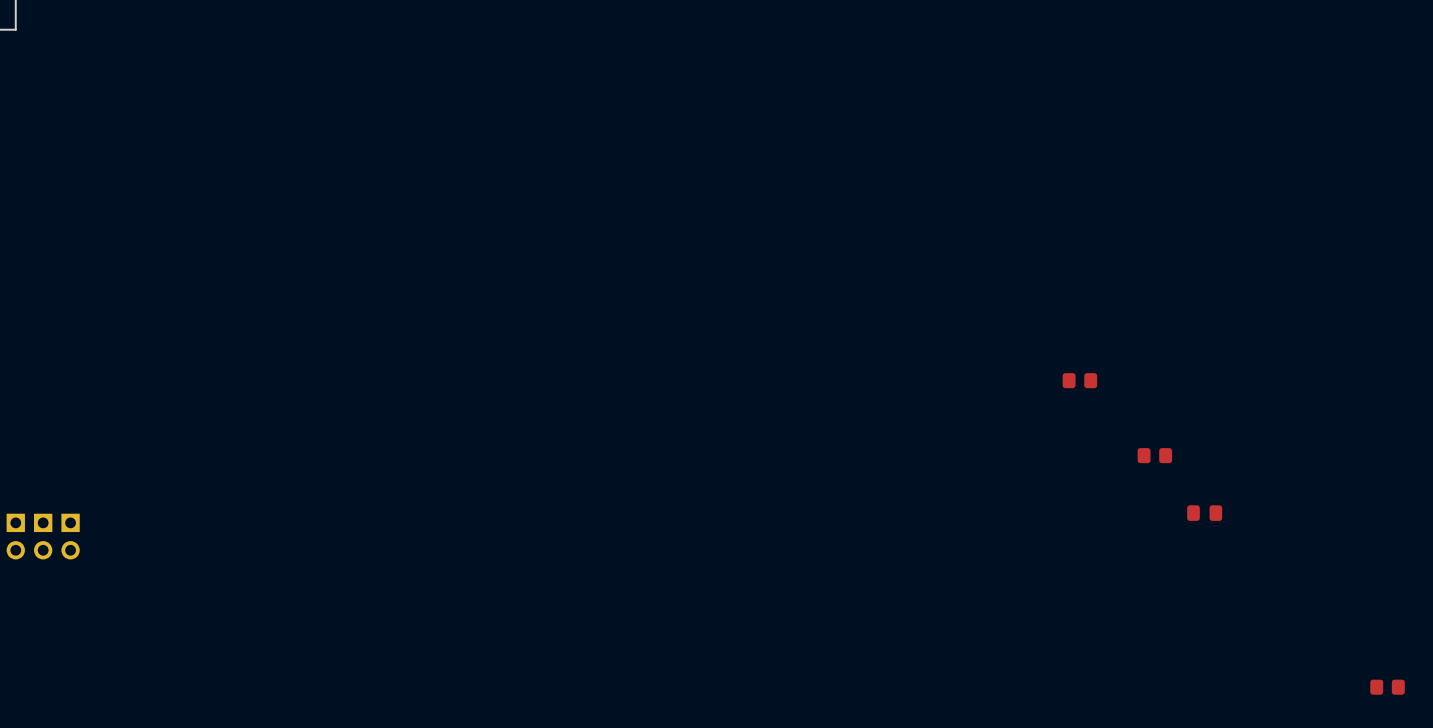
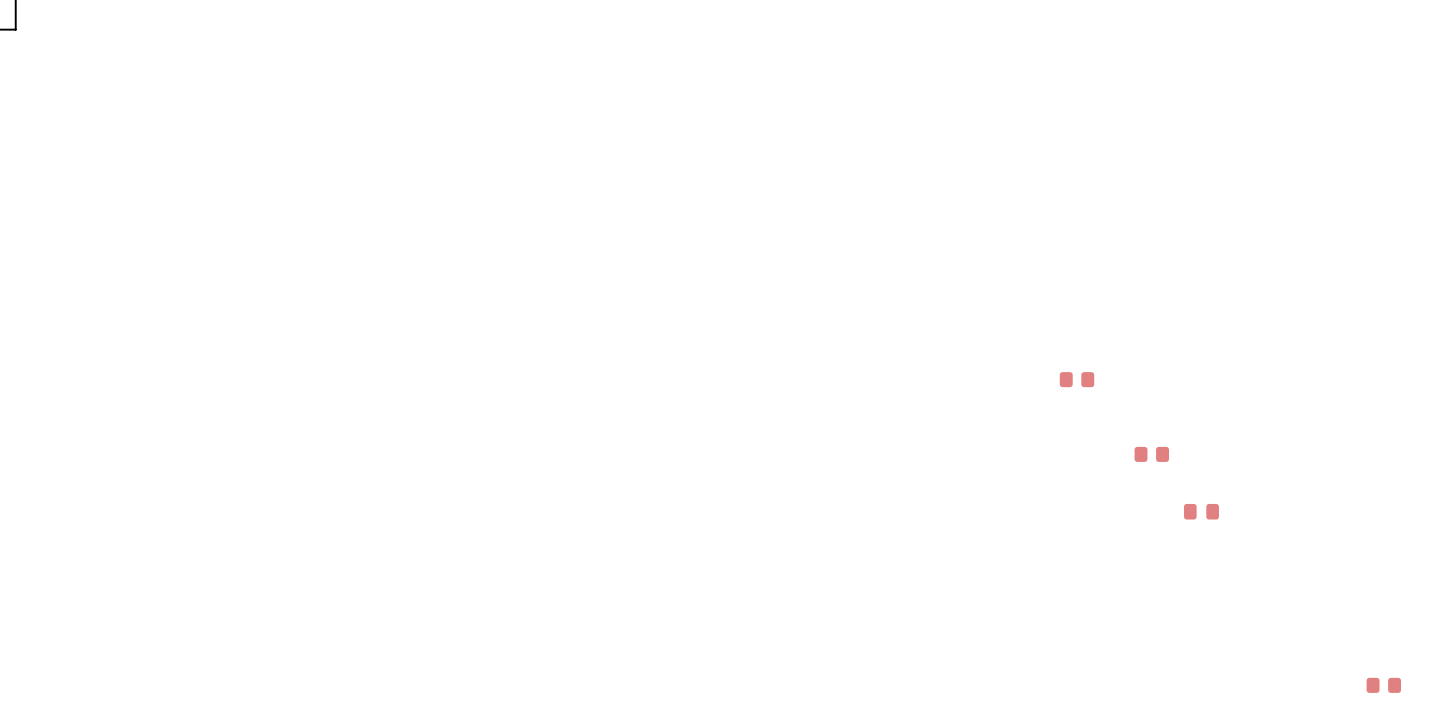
part: (15, 536) -> none
part: (43, 536) -> none
part: (70, 536) -> none

